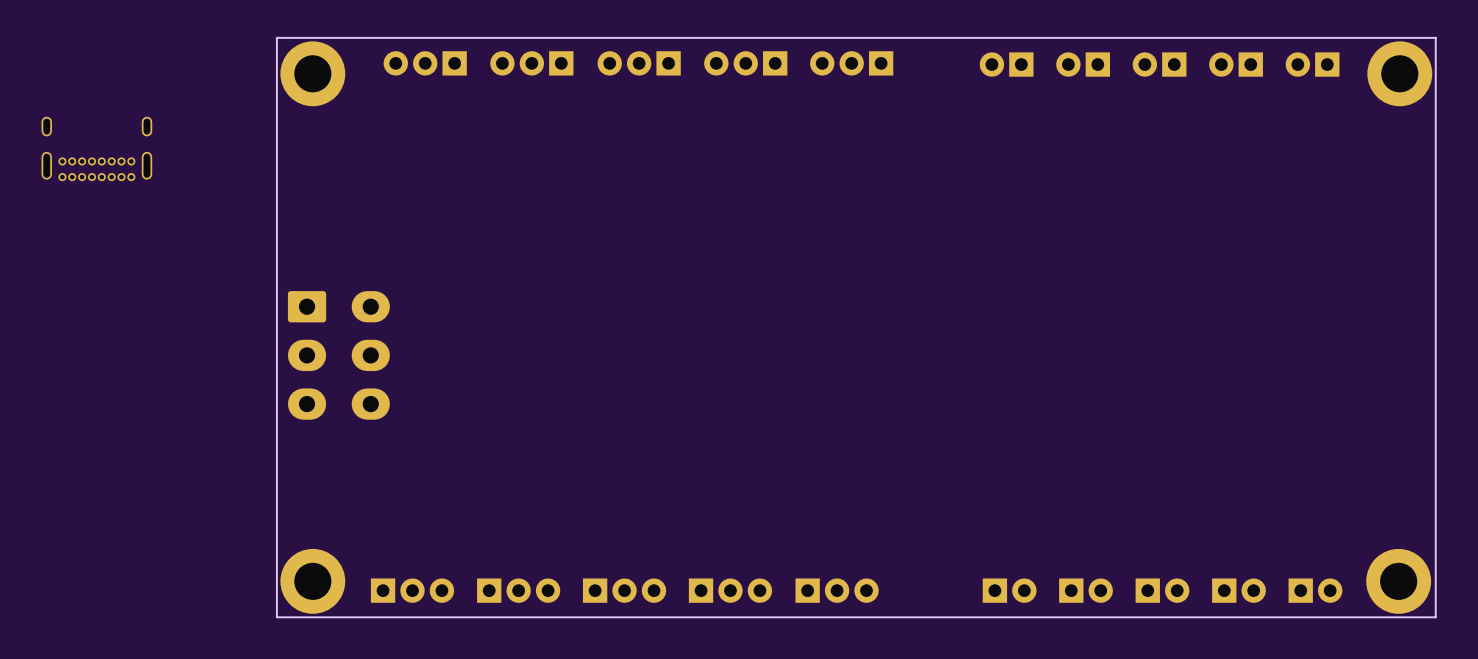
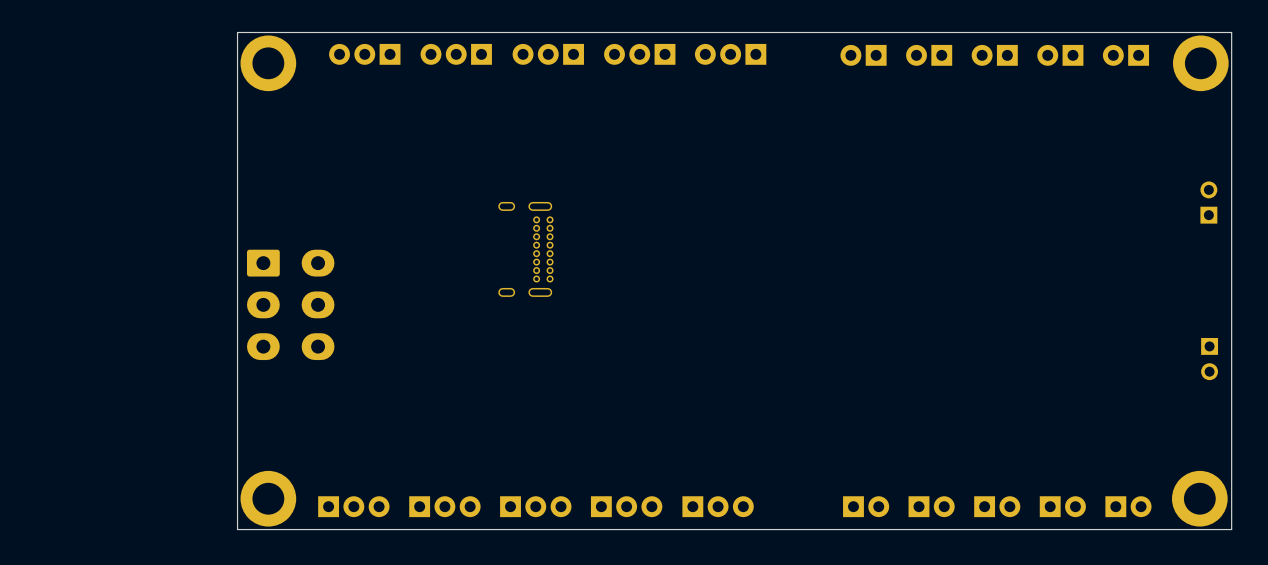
part: (96, 148) -> none
part: none -> (1208, 202)
part: none -> (525, 249)
part: none -> (1209, 359)

